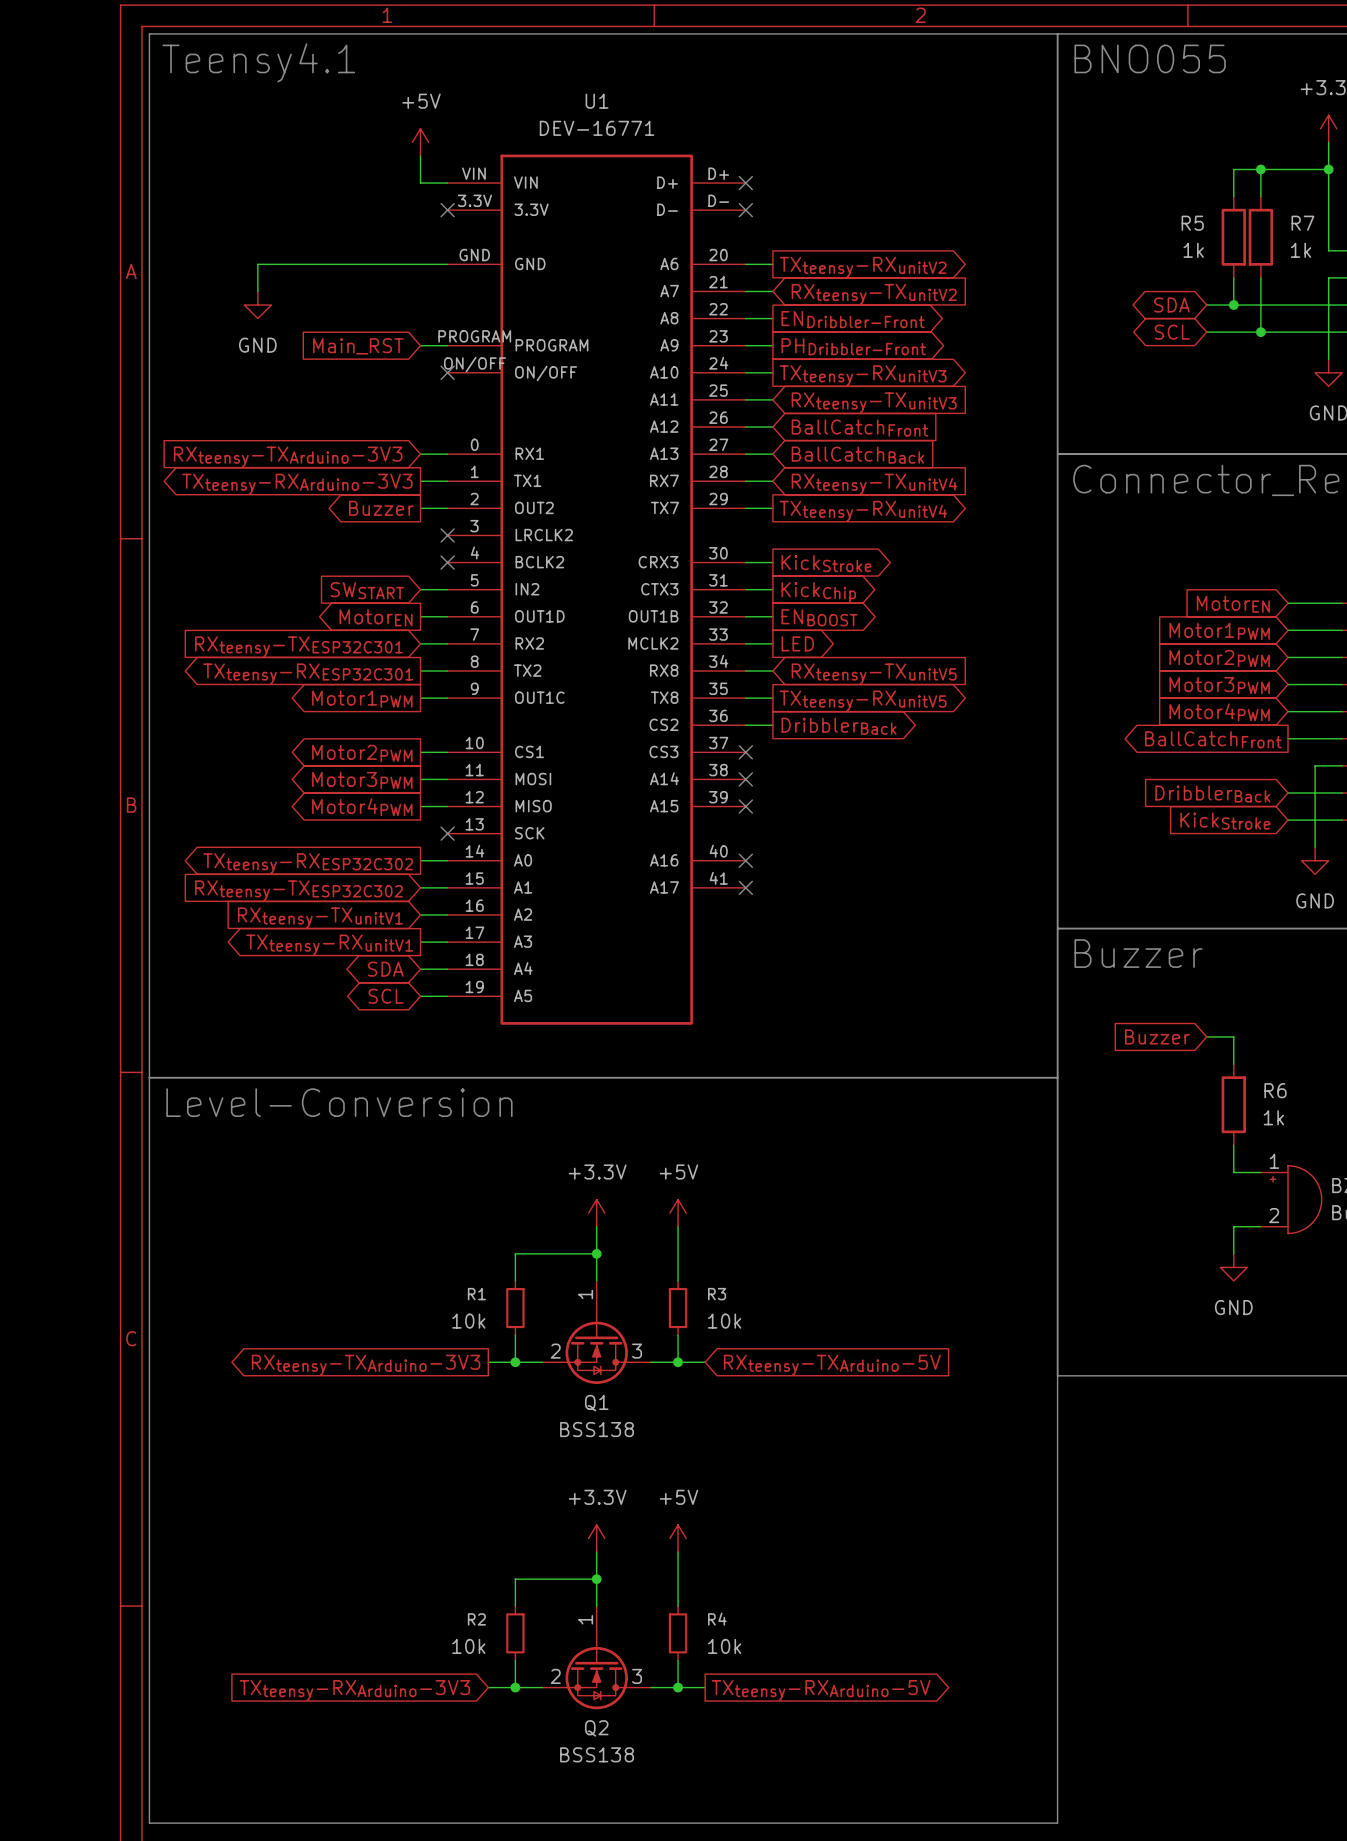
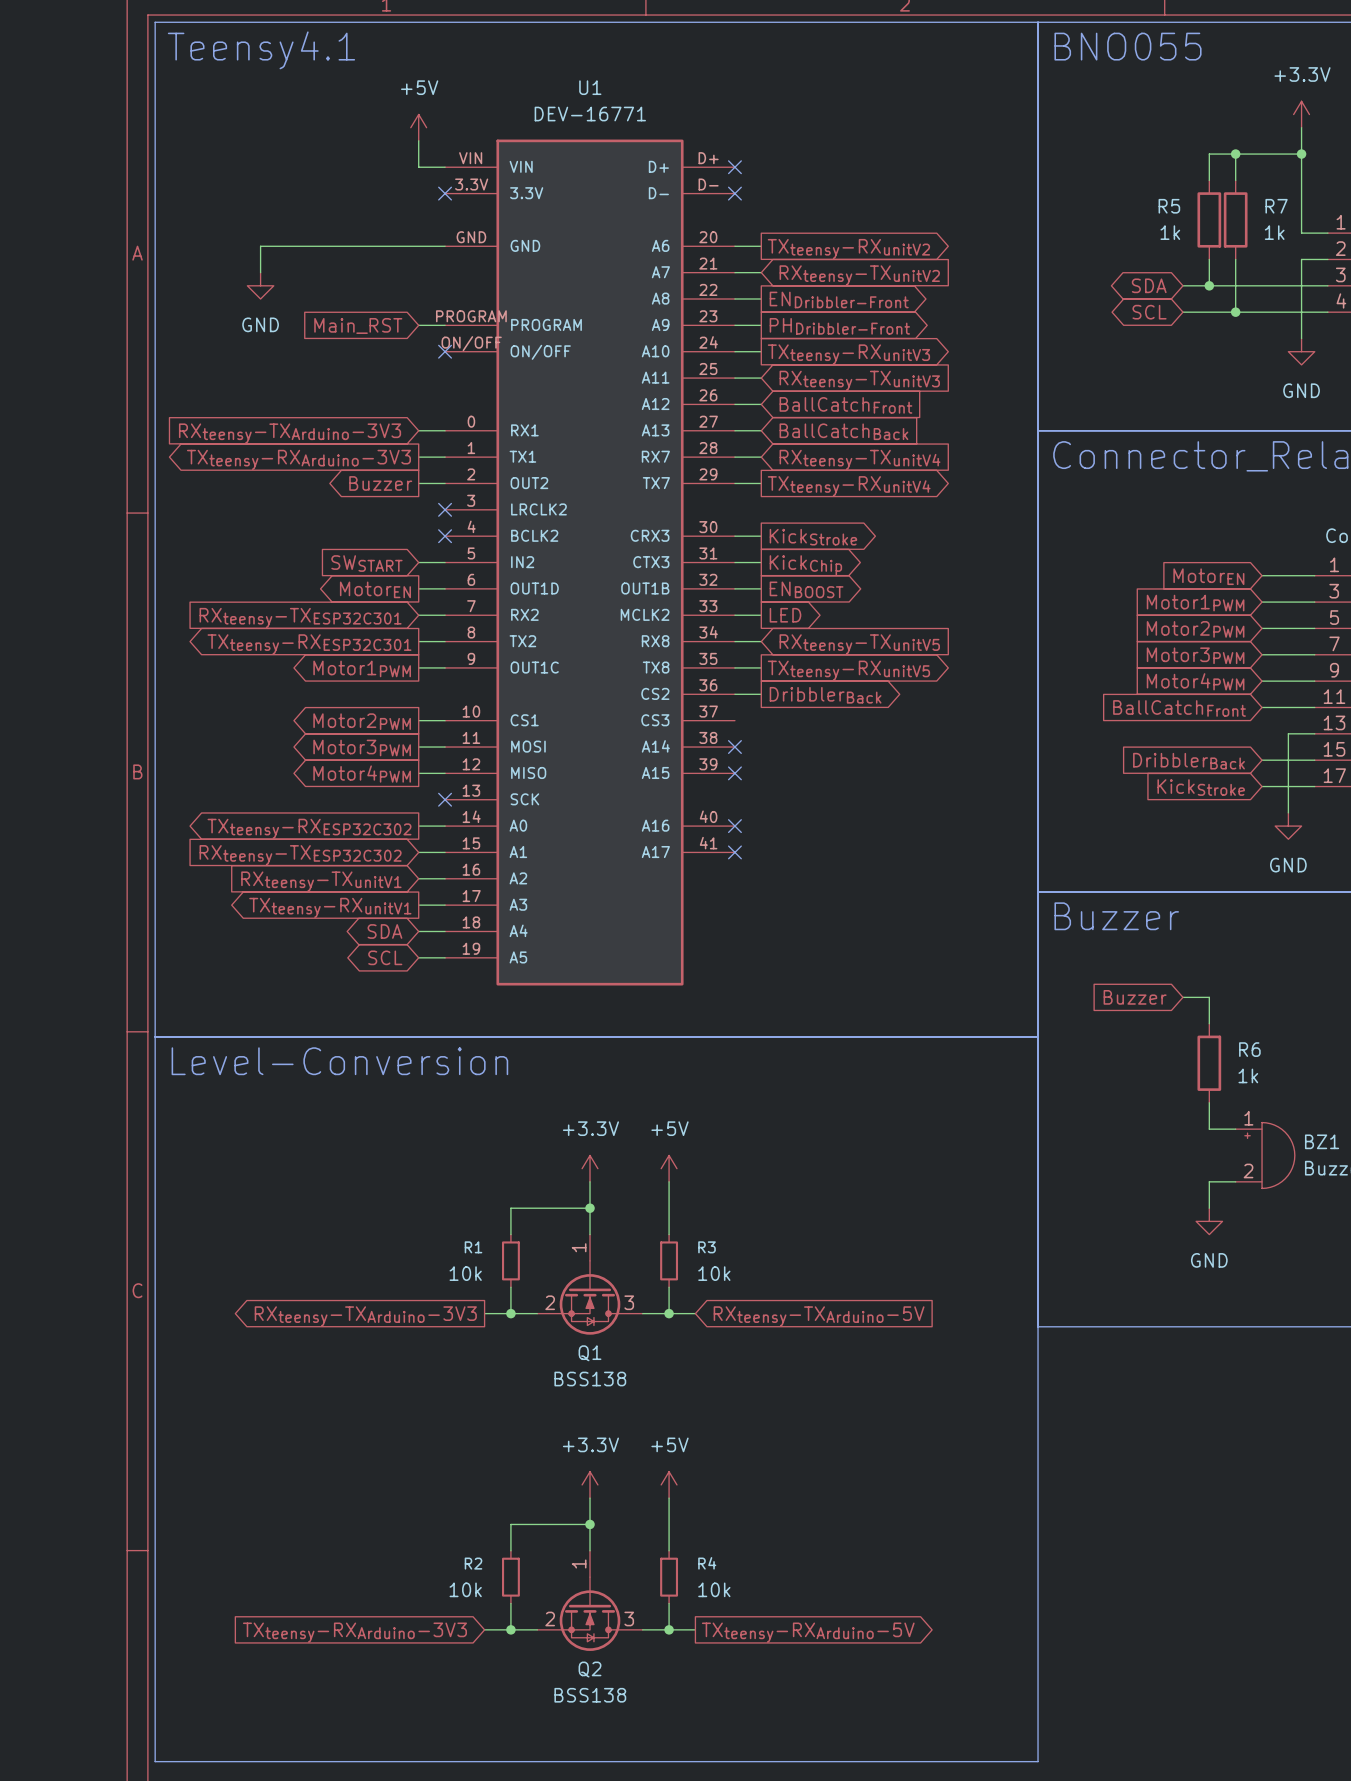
global label shape: output (1213, 739) -> input (1179, 708)
no-connect mark: (745, 752) -> none

